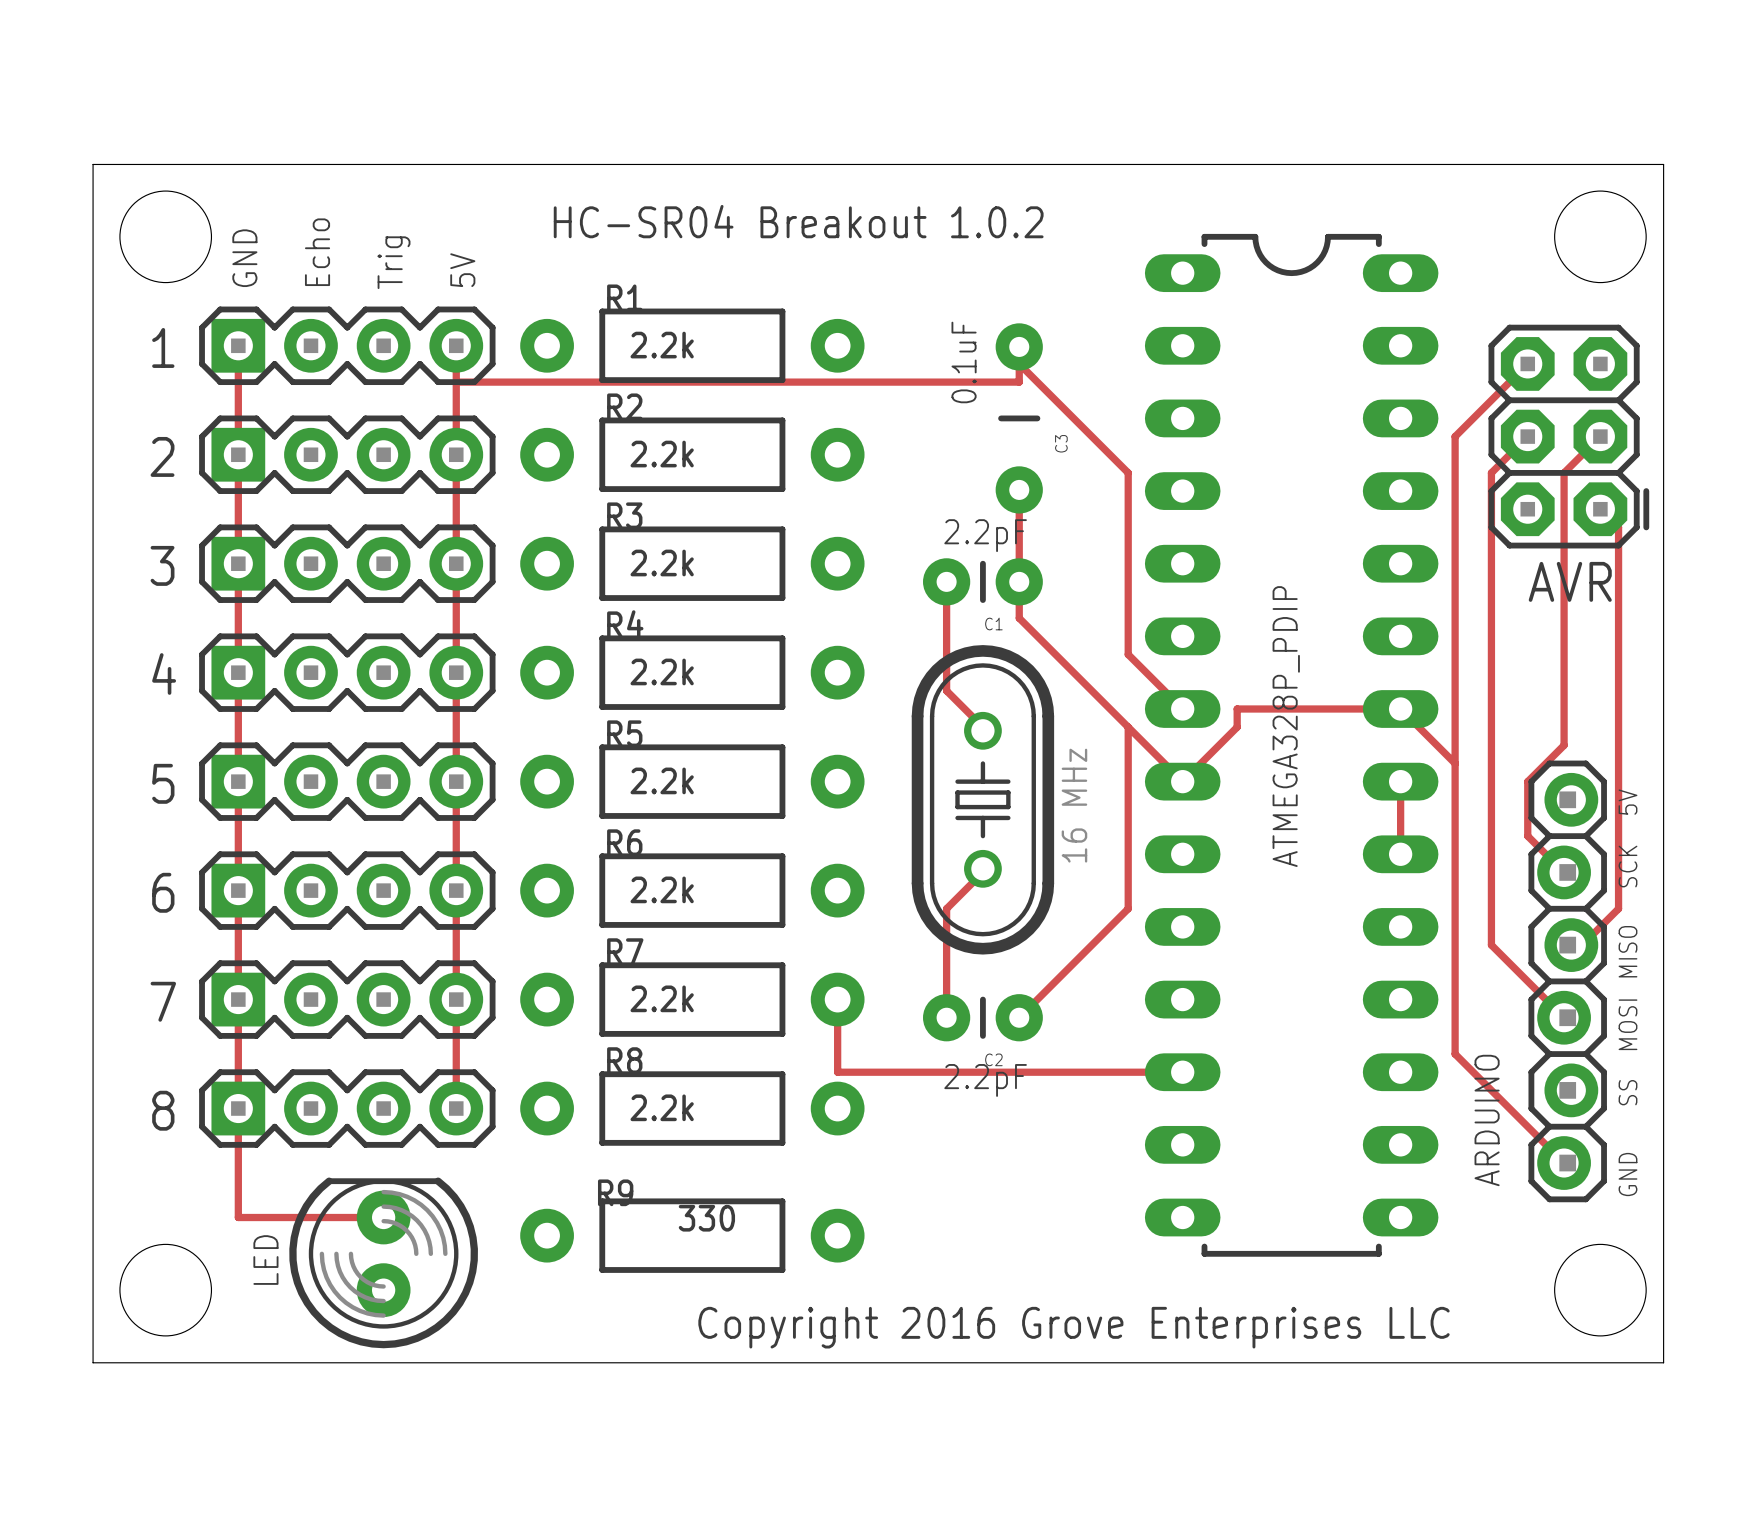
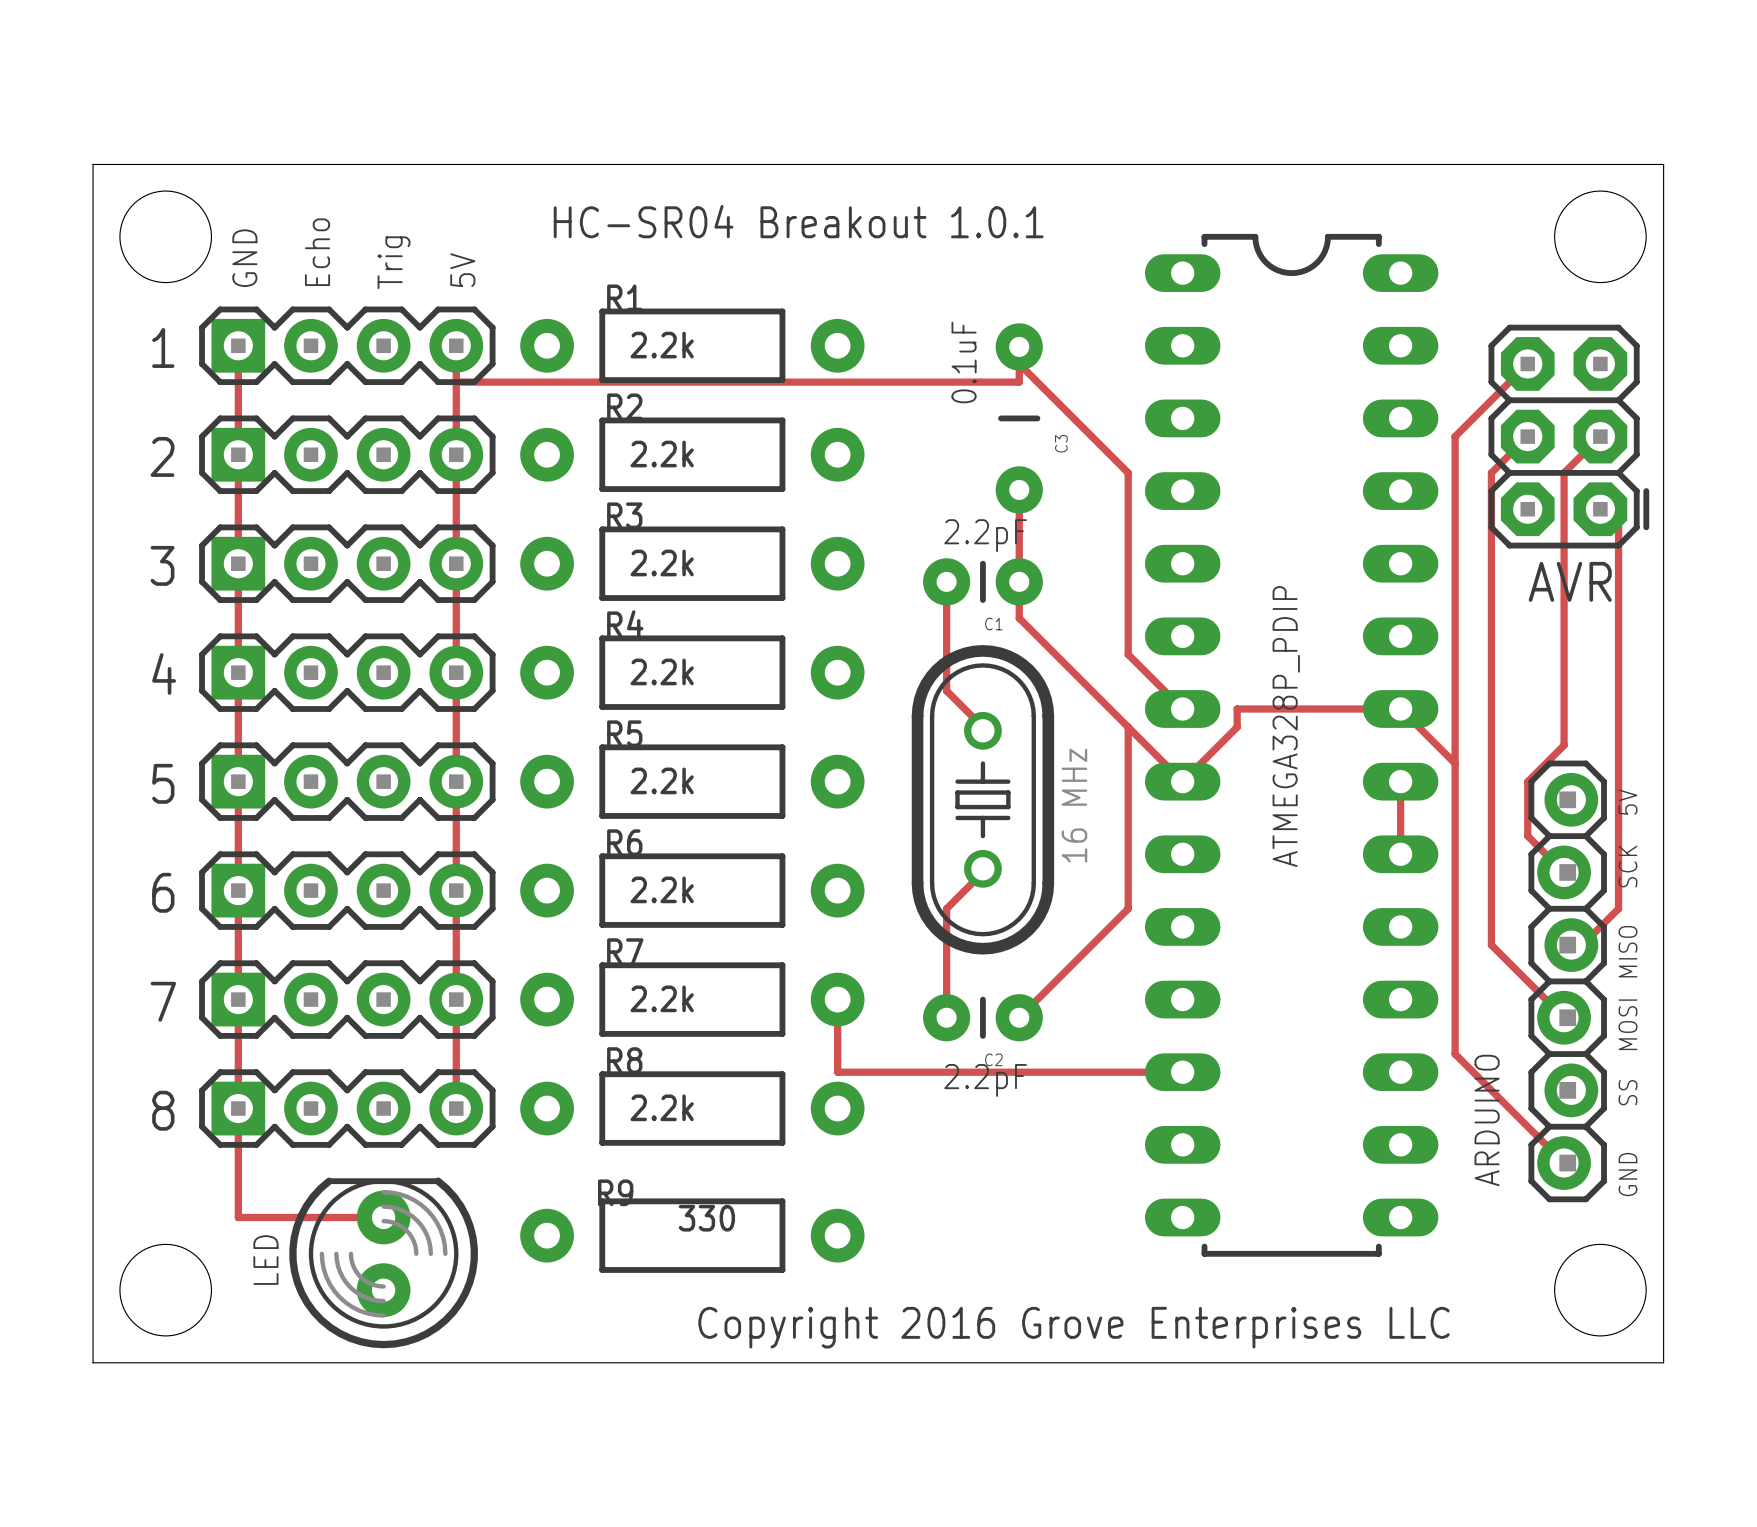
text: HC-SR04 Breakout 1.0.2 (798, 221) -> HC-SR04 Breakout 1.0.1 (798, 221)

